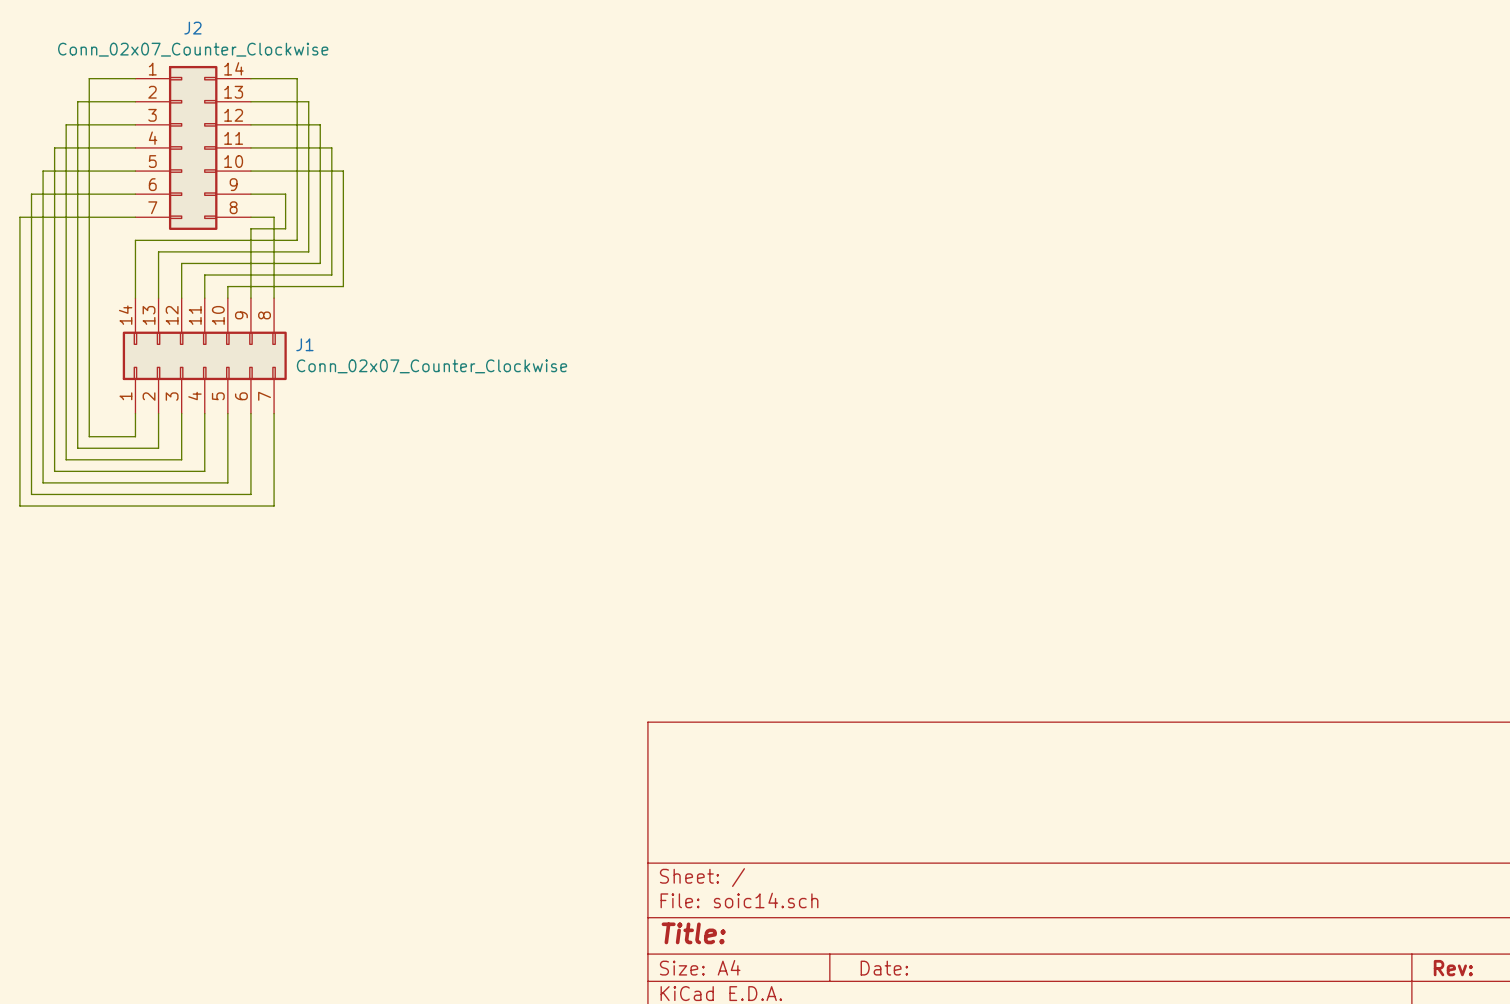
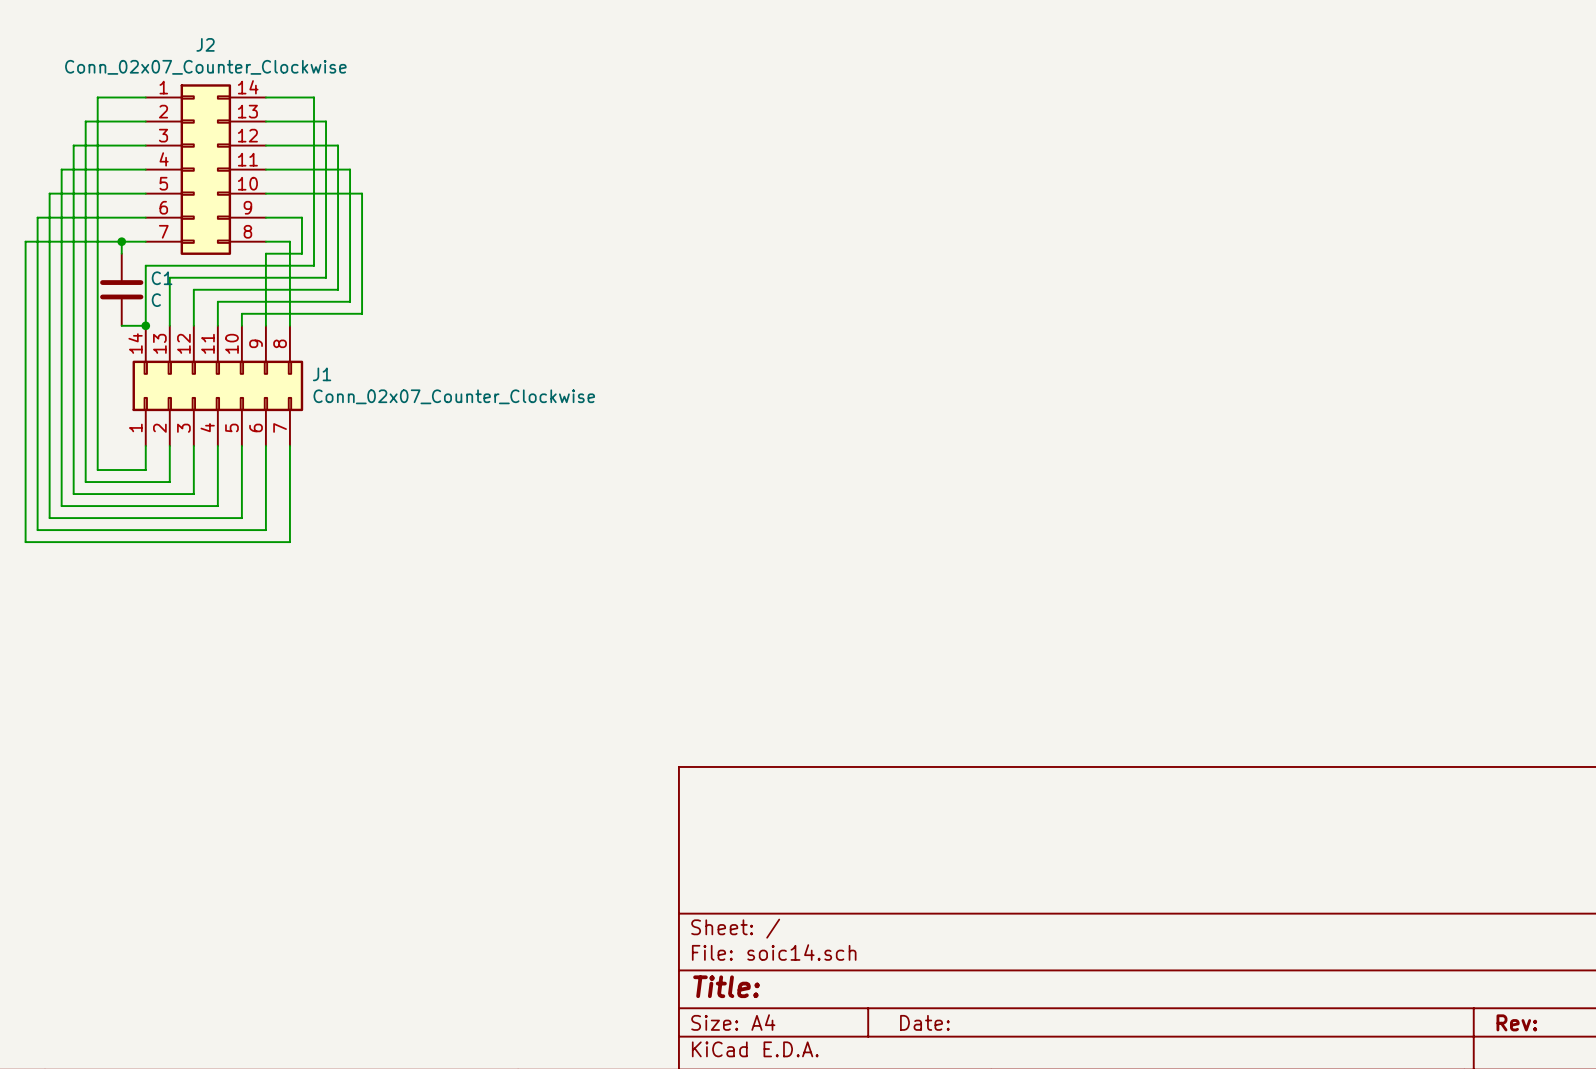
wire: none -> (121, 241) (121, 253)
junction: none -> (121, 241)
C1: none -> C (121, 289)
wire: none -> (121, 325) (145, 325)
junction: none -> (145, 325)

